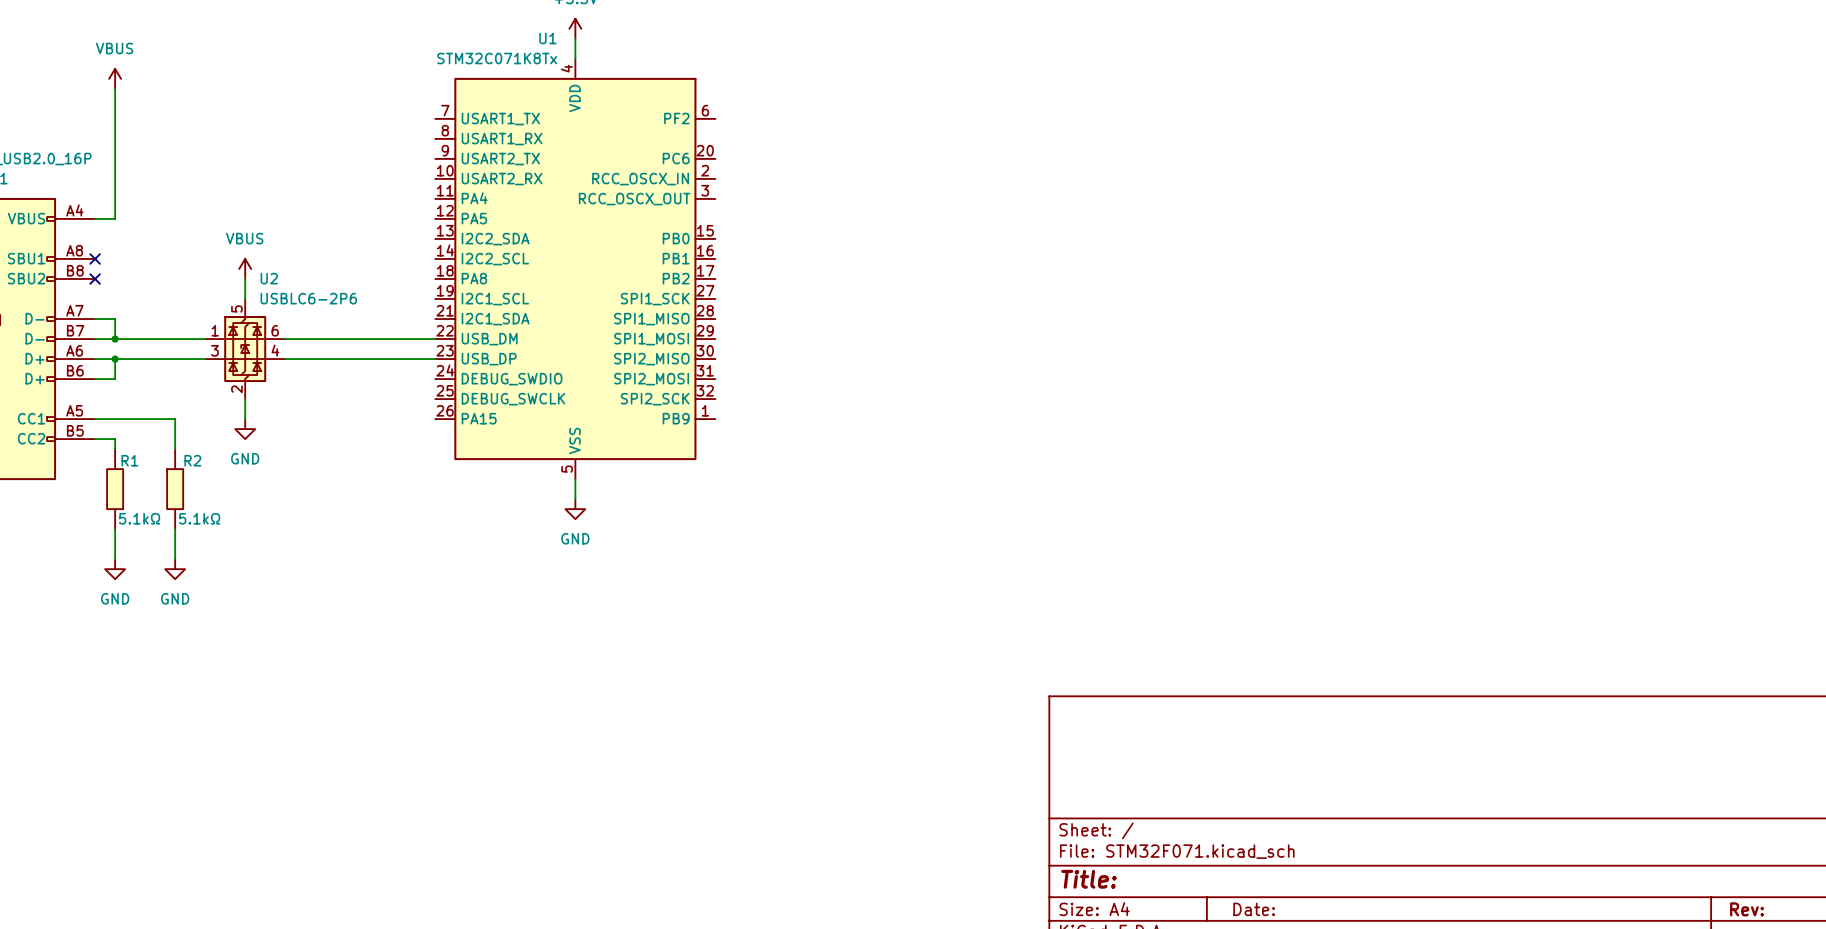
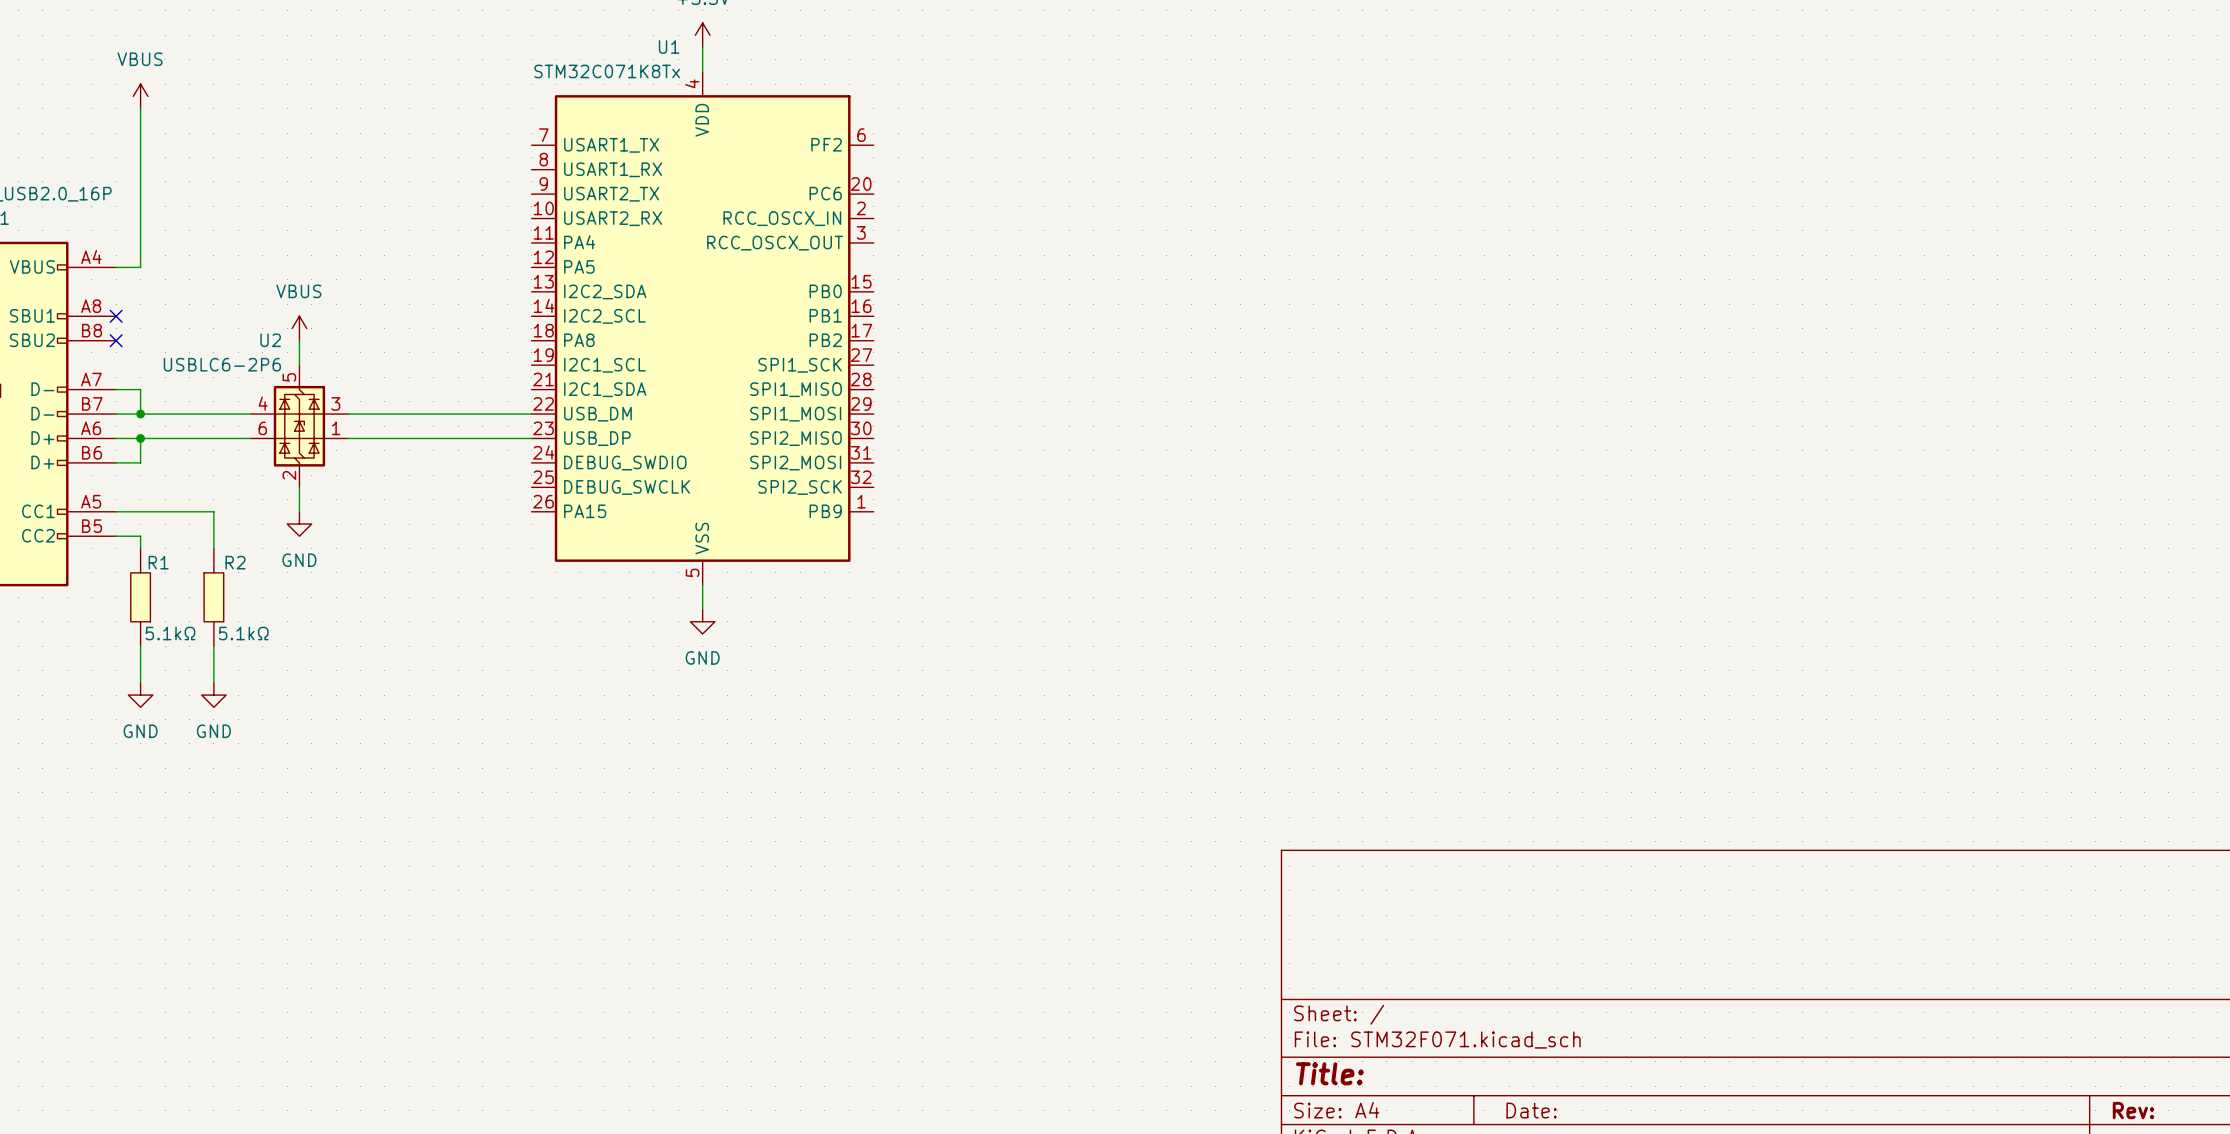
U2 name position: U2 (269, 278) -> U2 (270, 340)
U2 value position: USBLC6-2P6 (308, 298) -> USBLC6-2P6 (222, 364)
U2 symbol: [205, 299, 286, 400] -> [250, 365, 349, 488]

